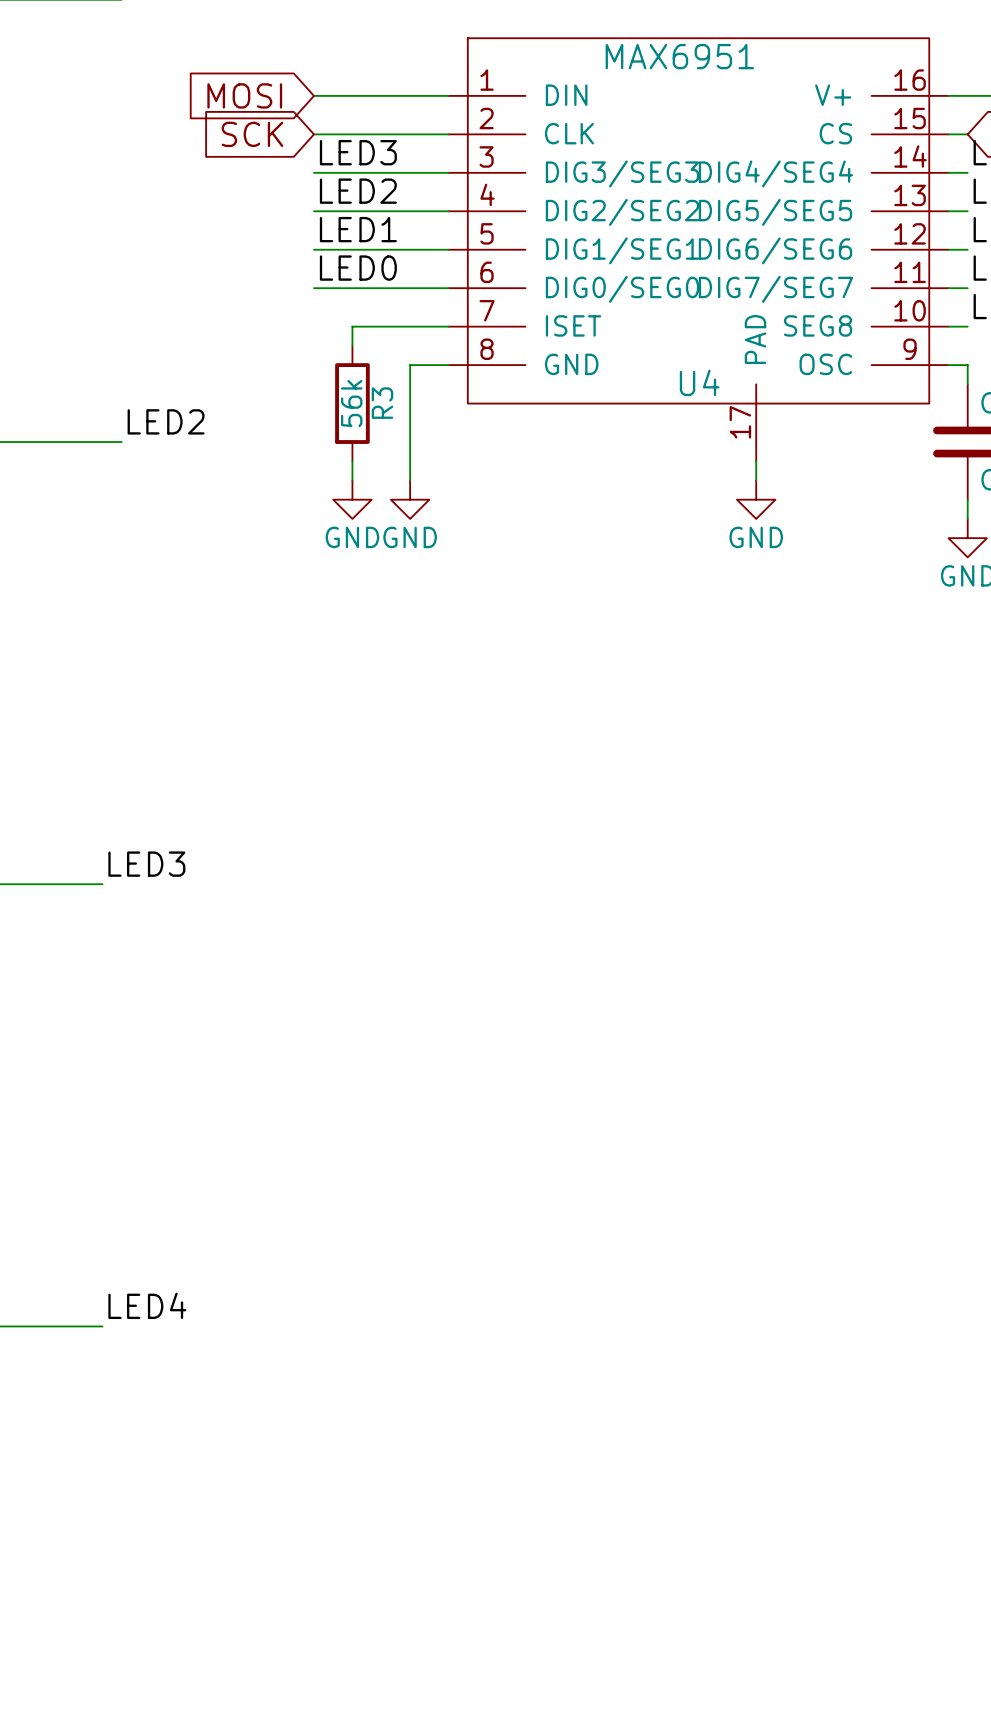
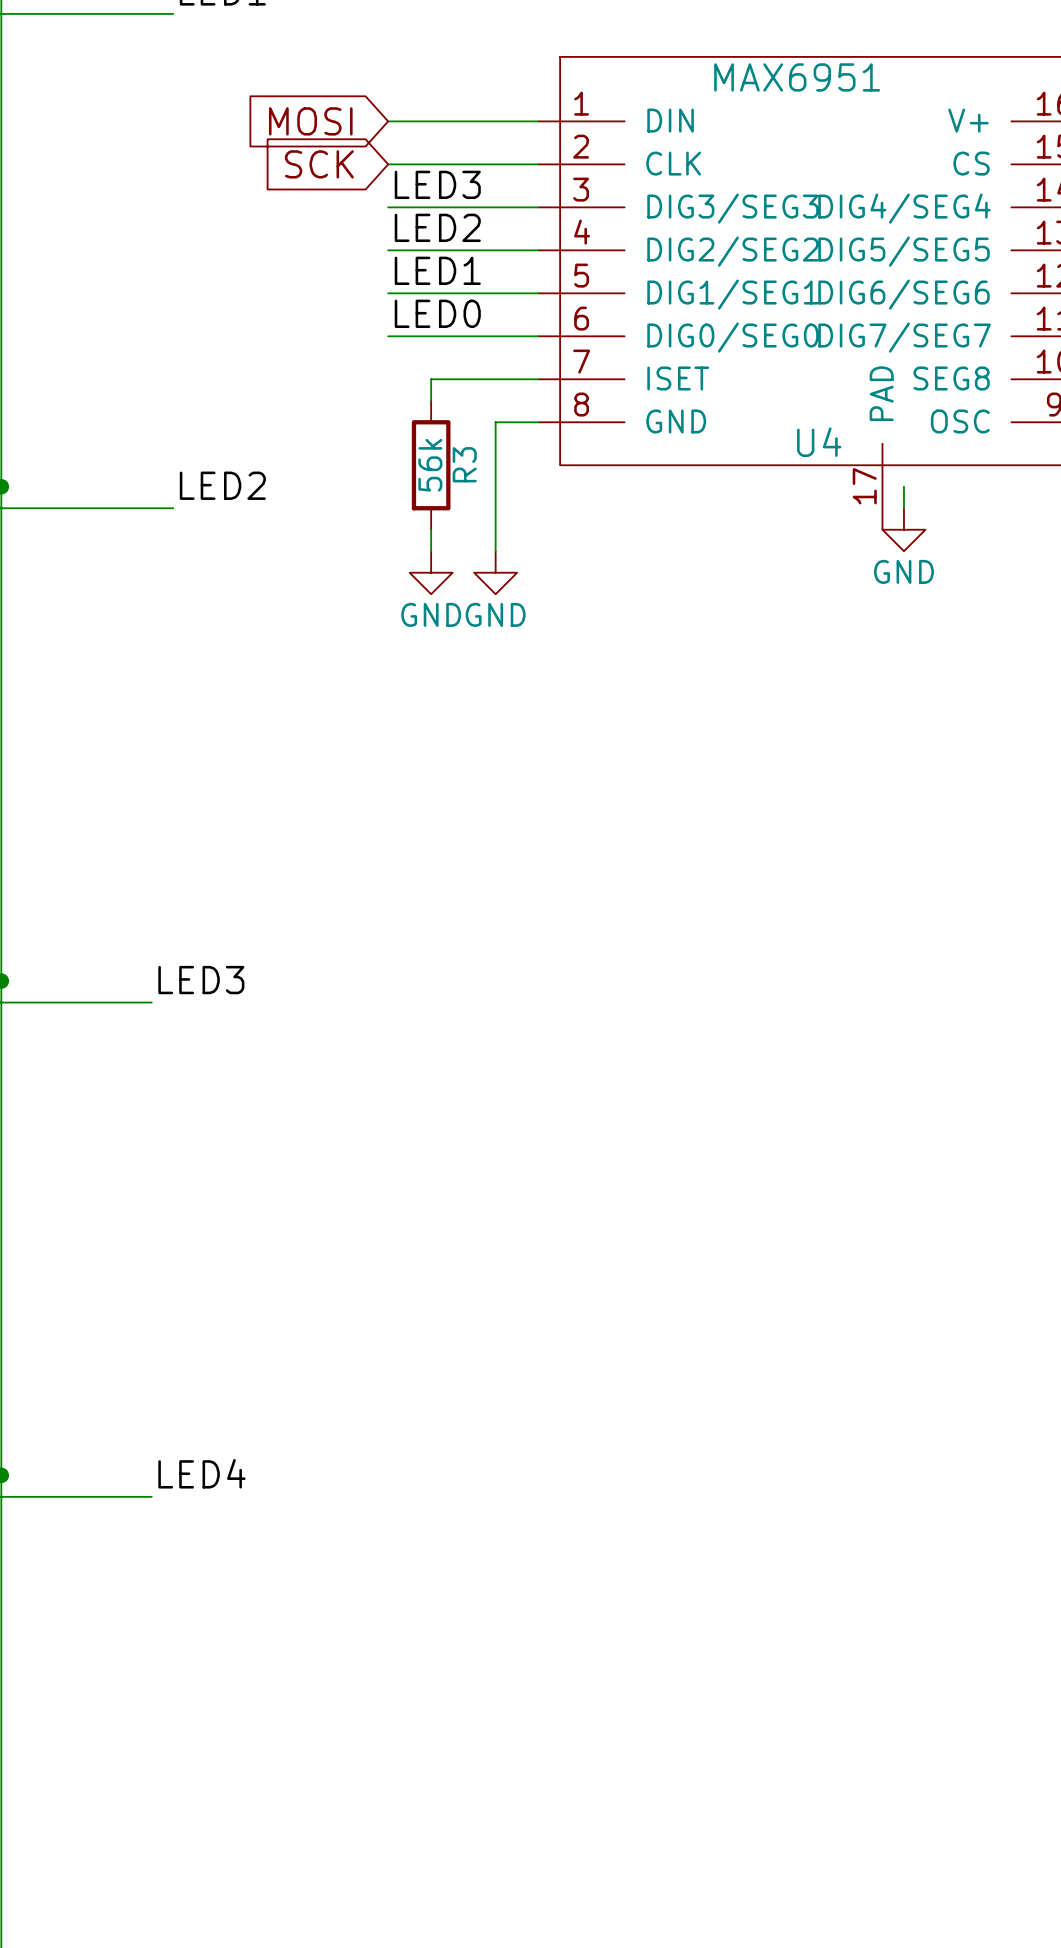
wire: (756, 461) (756, 480) -> (903, 486) (903, 508)
power symbol position: GND (756, 499) -> GND (903, 529)

